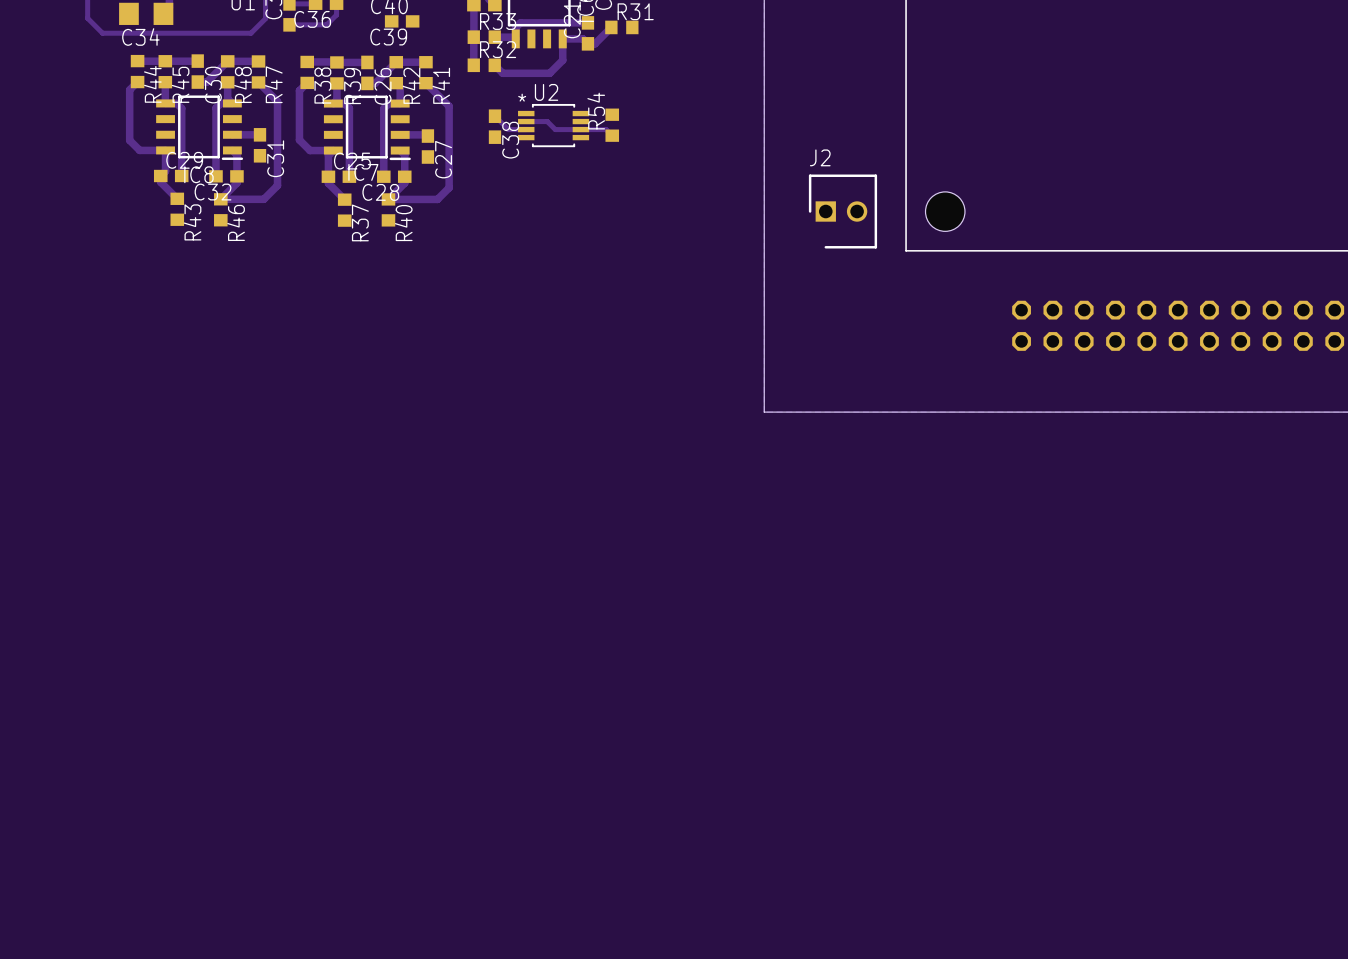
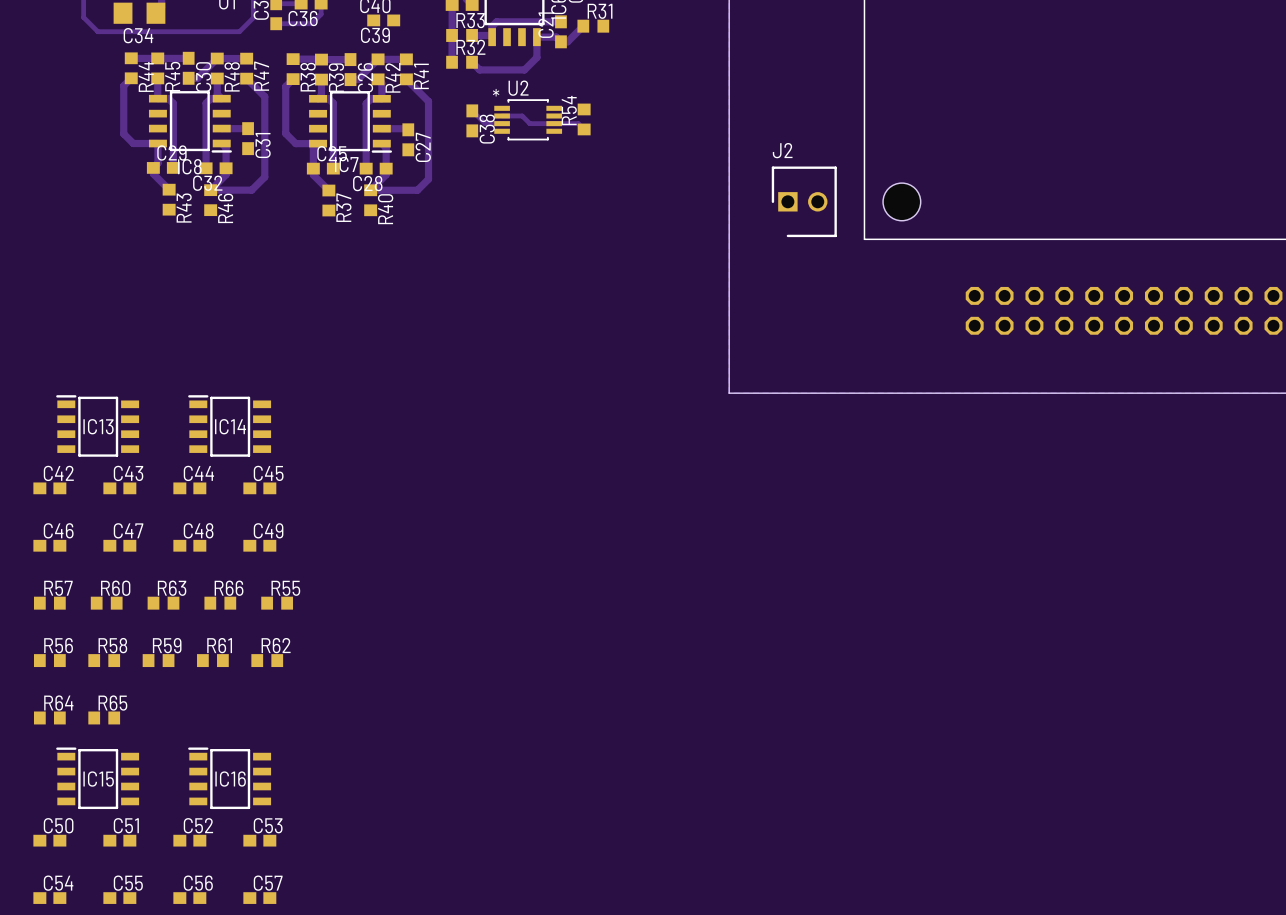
IC13: none -> (97, 425)
IC14: none -> (229, 425)
C42: none -> (49, 488)
C43: none -> (119, 488)
C44: none -> (189, 488)
C45: none -> (259, 488)
C46: none -> (49, 545)
C47: none -> (119, 545)
C48: none -> (189, 545)
C49: none -> (259, 545)
R57: none -> (49, 603)
R60: none -> (106, 603)
R63: none -> (163, 603)
R66: none -> (220, 603)
R55: none -> (277, 603)
R56: none -> (49, 660)
R58: none -> (104, 660)
R59: none -> (158, 660)
R61: none -> (212, 660)
R62: none -> (267, 660)
R64: none -> (49, 717)
R65: none -> (104, 717)
IC15: none -> (97, 778)
IC16: none -> (229, 778)
C50: none -> (49, 840)
C51: none -> (119, 840)
C52: none -> (189, 840)
C53: none -> (259, 840)
C54: none -> (49, 898)
C55: none -> (119, 898)
C56: none -> (189, 898)
C57: none -> (259, 898)

